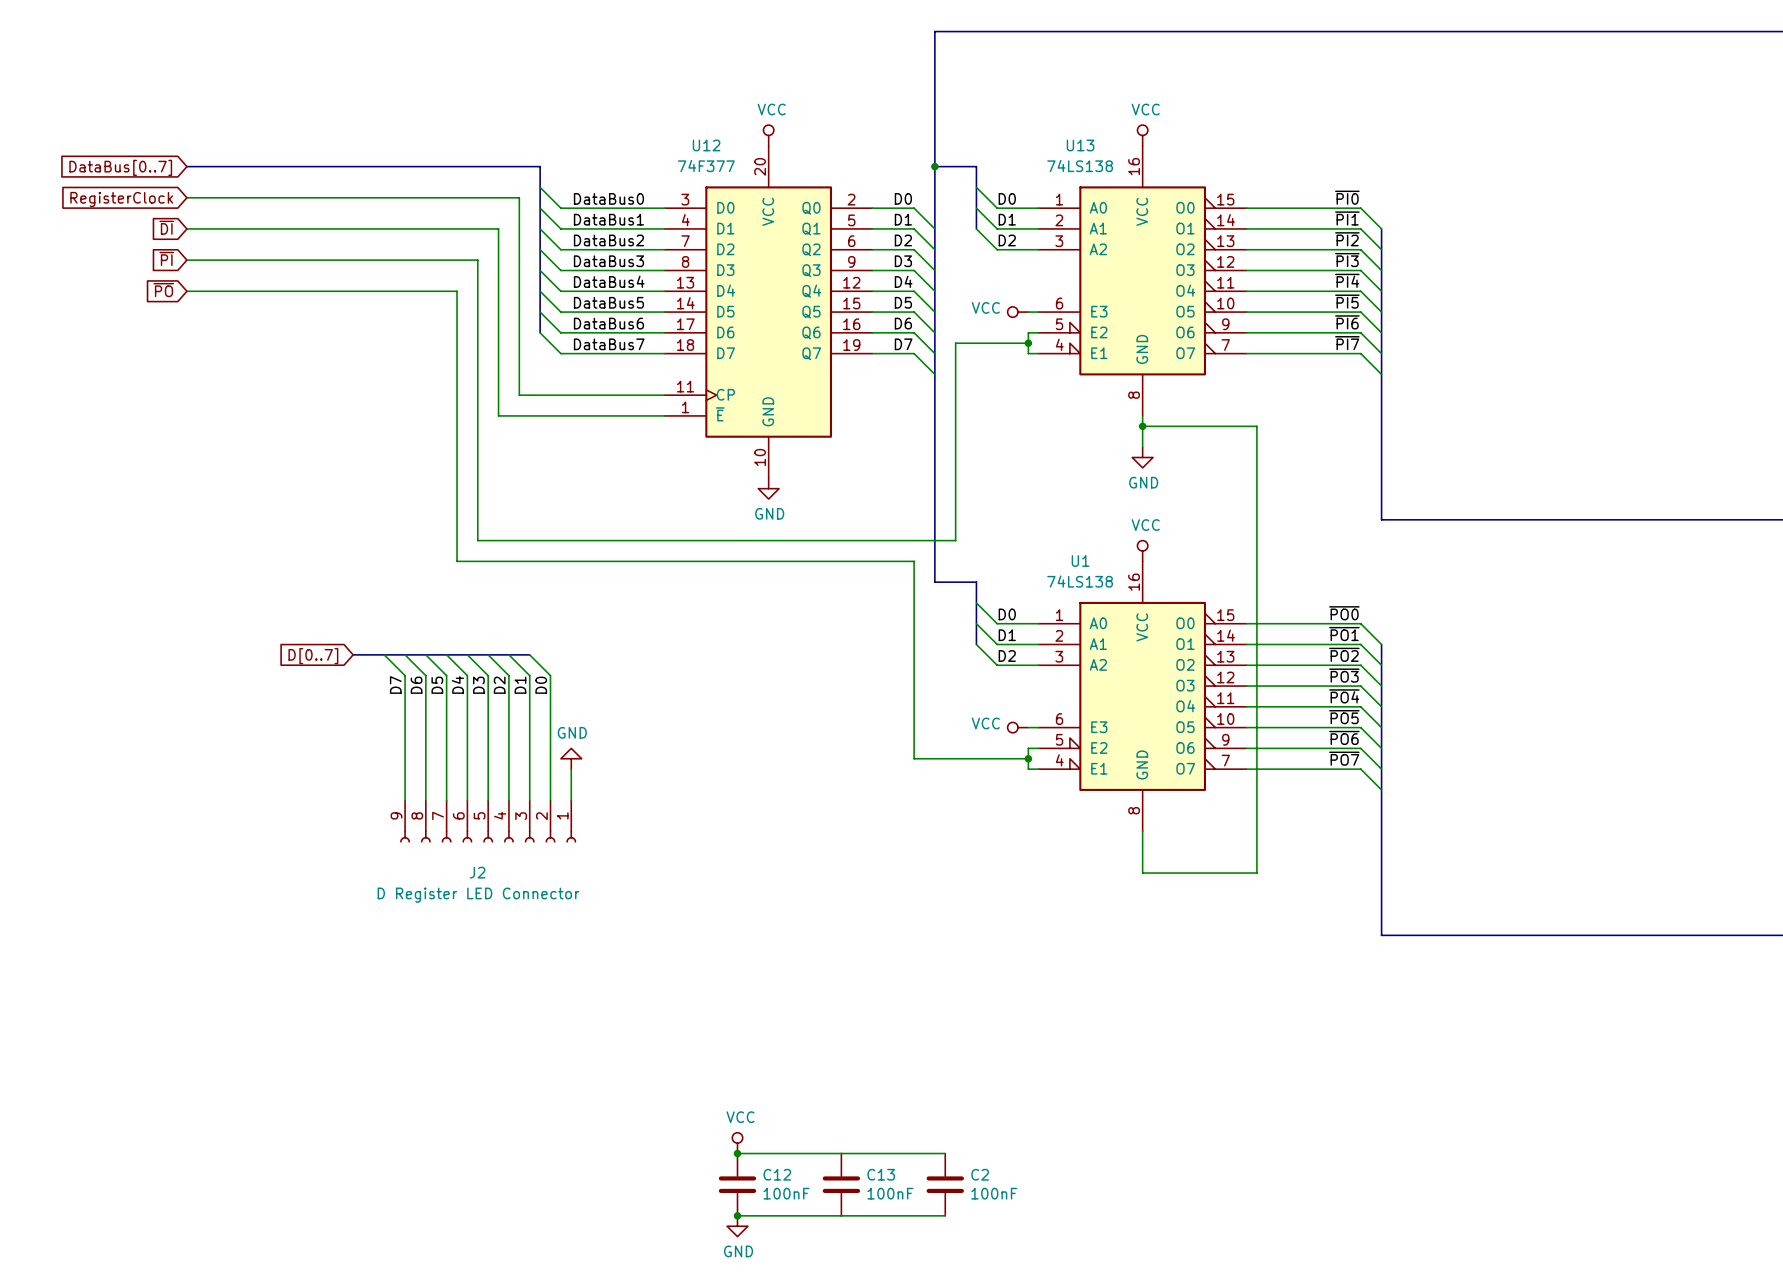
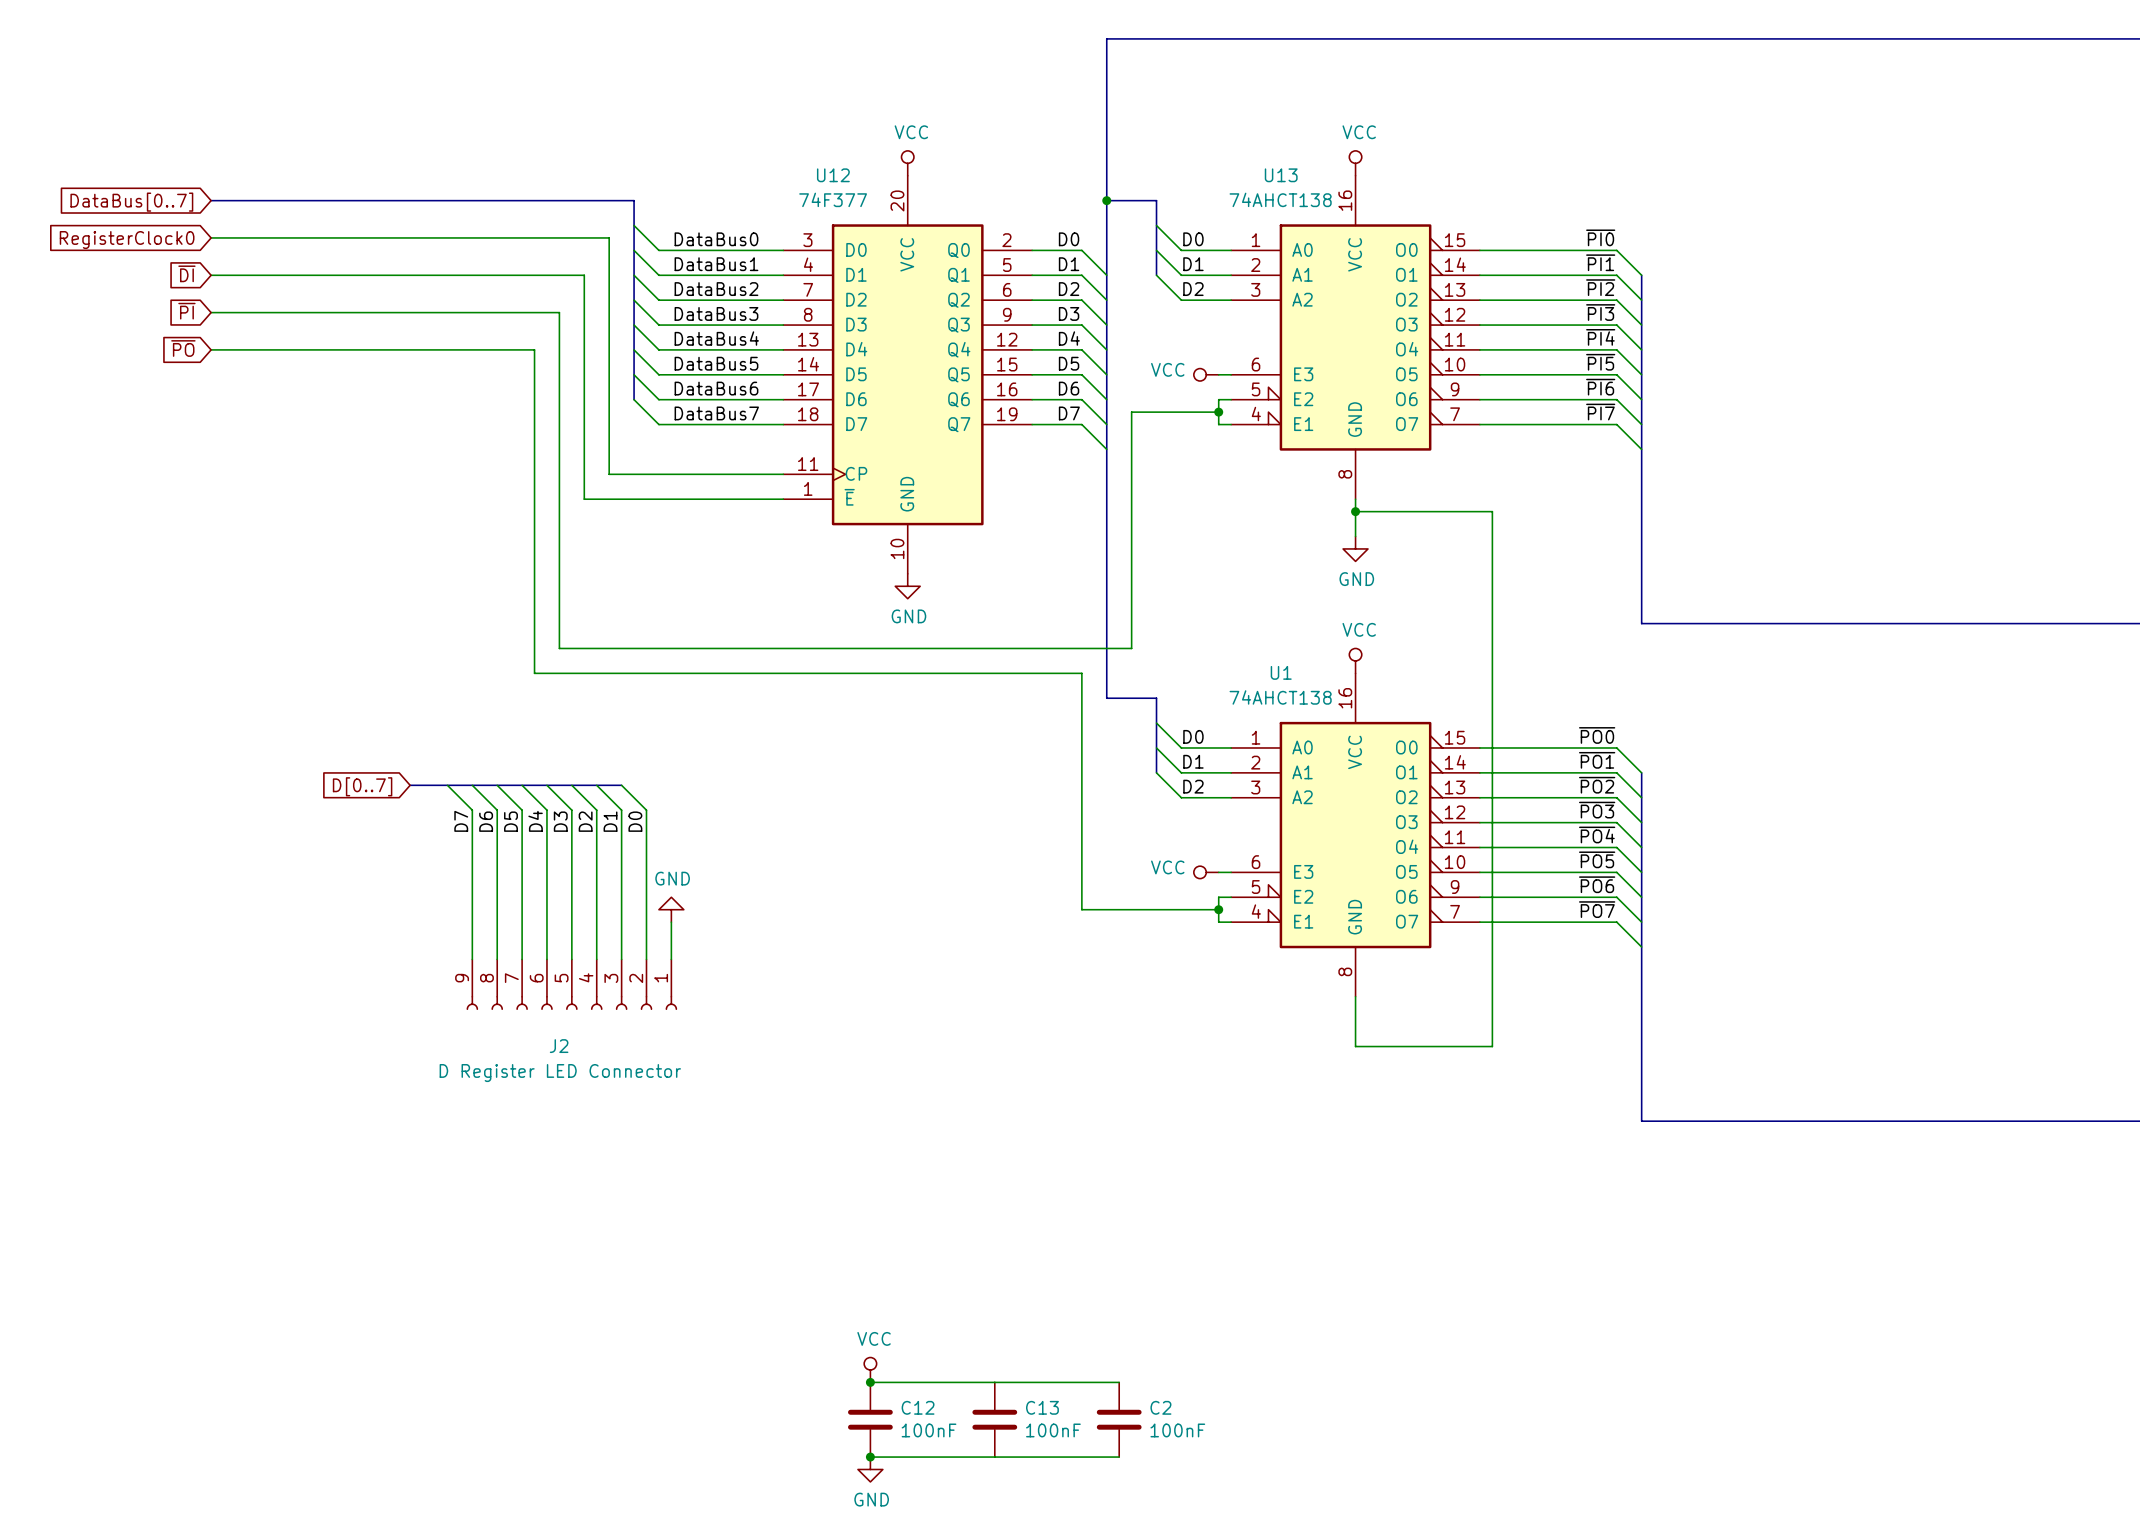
U13 value: 74LS138 (1080, 165) -> 74AHCT138 (1280, 199)
global label: RegisterClock (121, 199) -> RegisterClock0 (127, 240)
U1 value: 74LS138 (1080, 581) -> 74AHCT138 (1280, 697)

